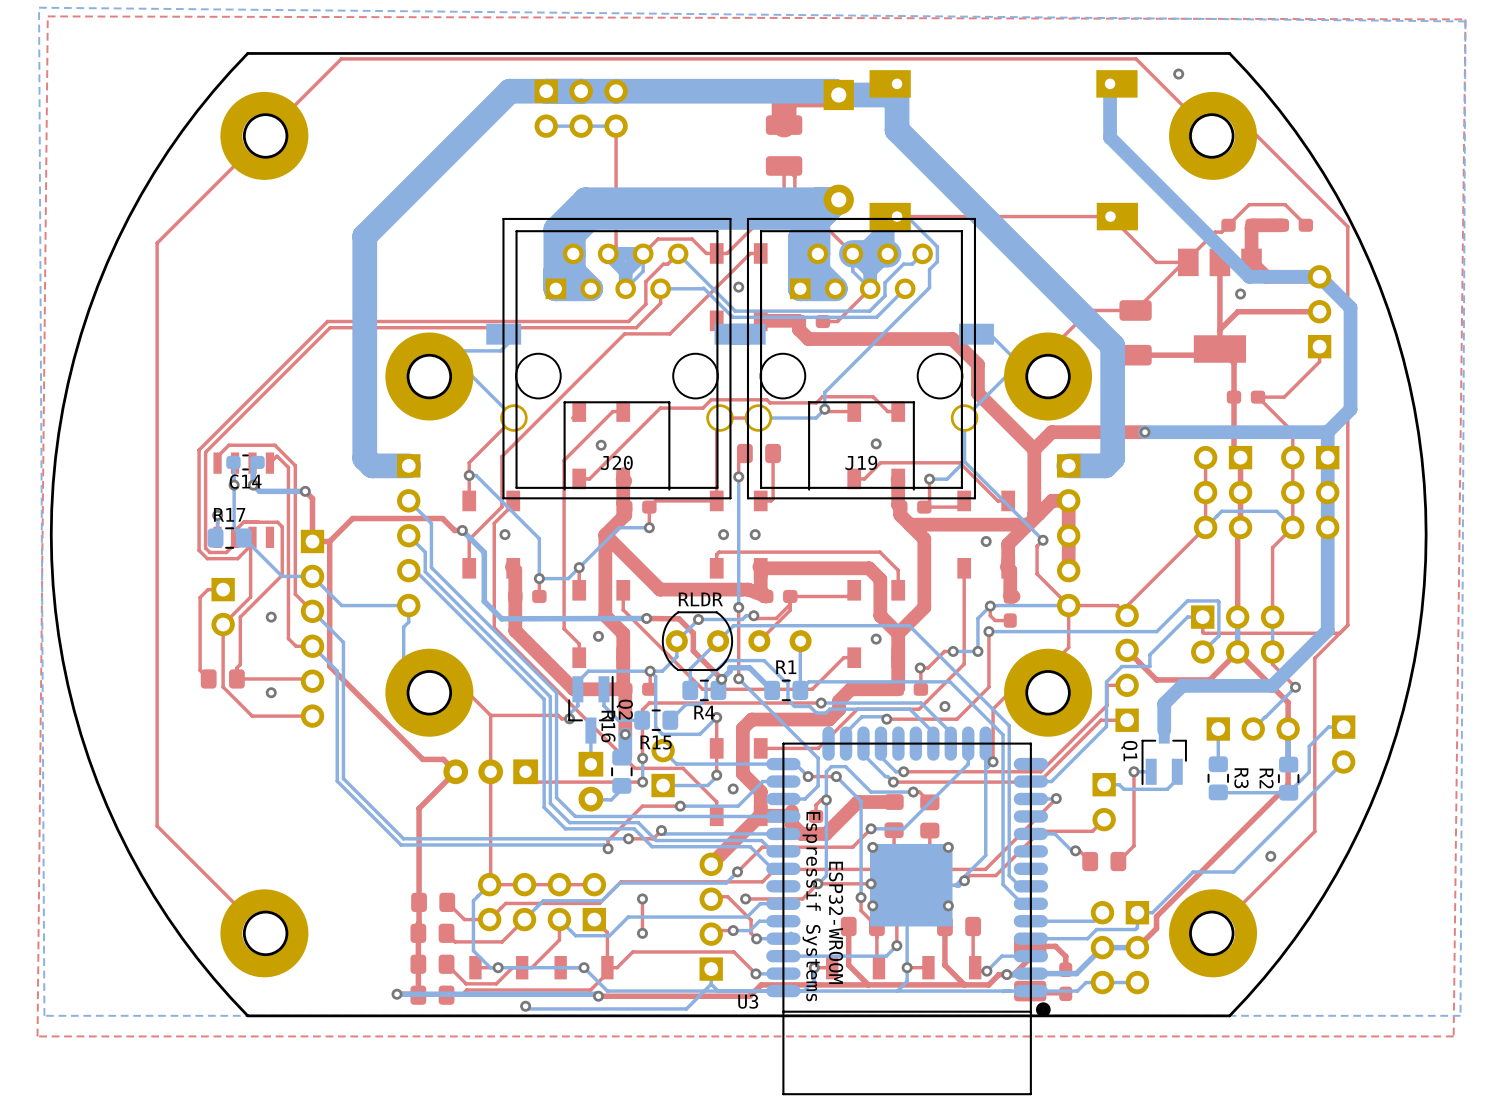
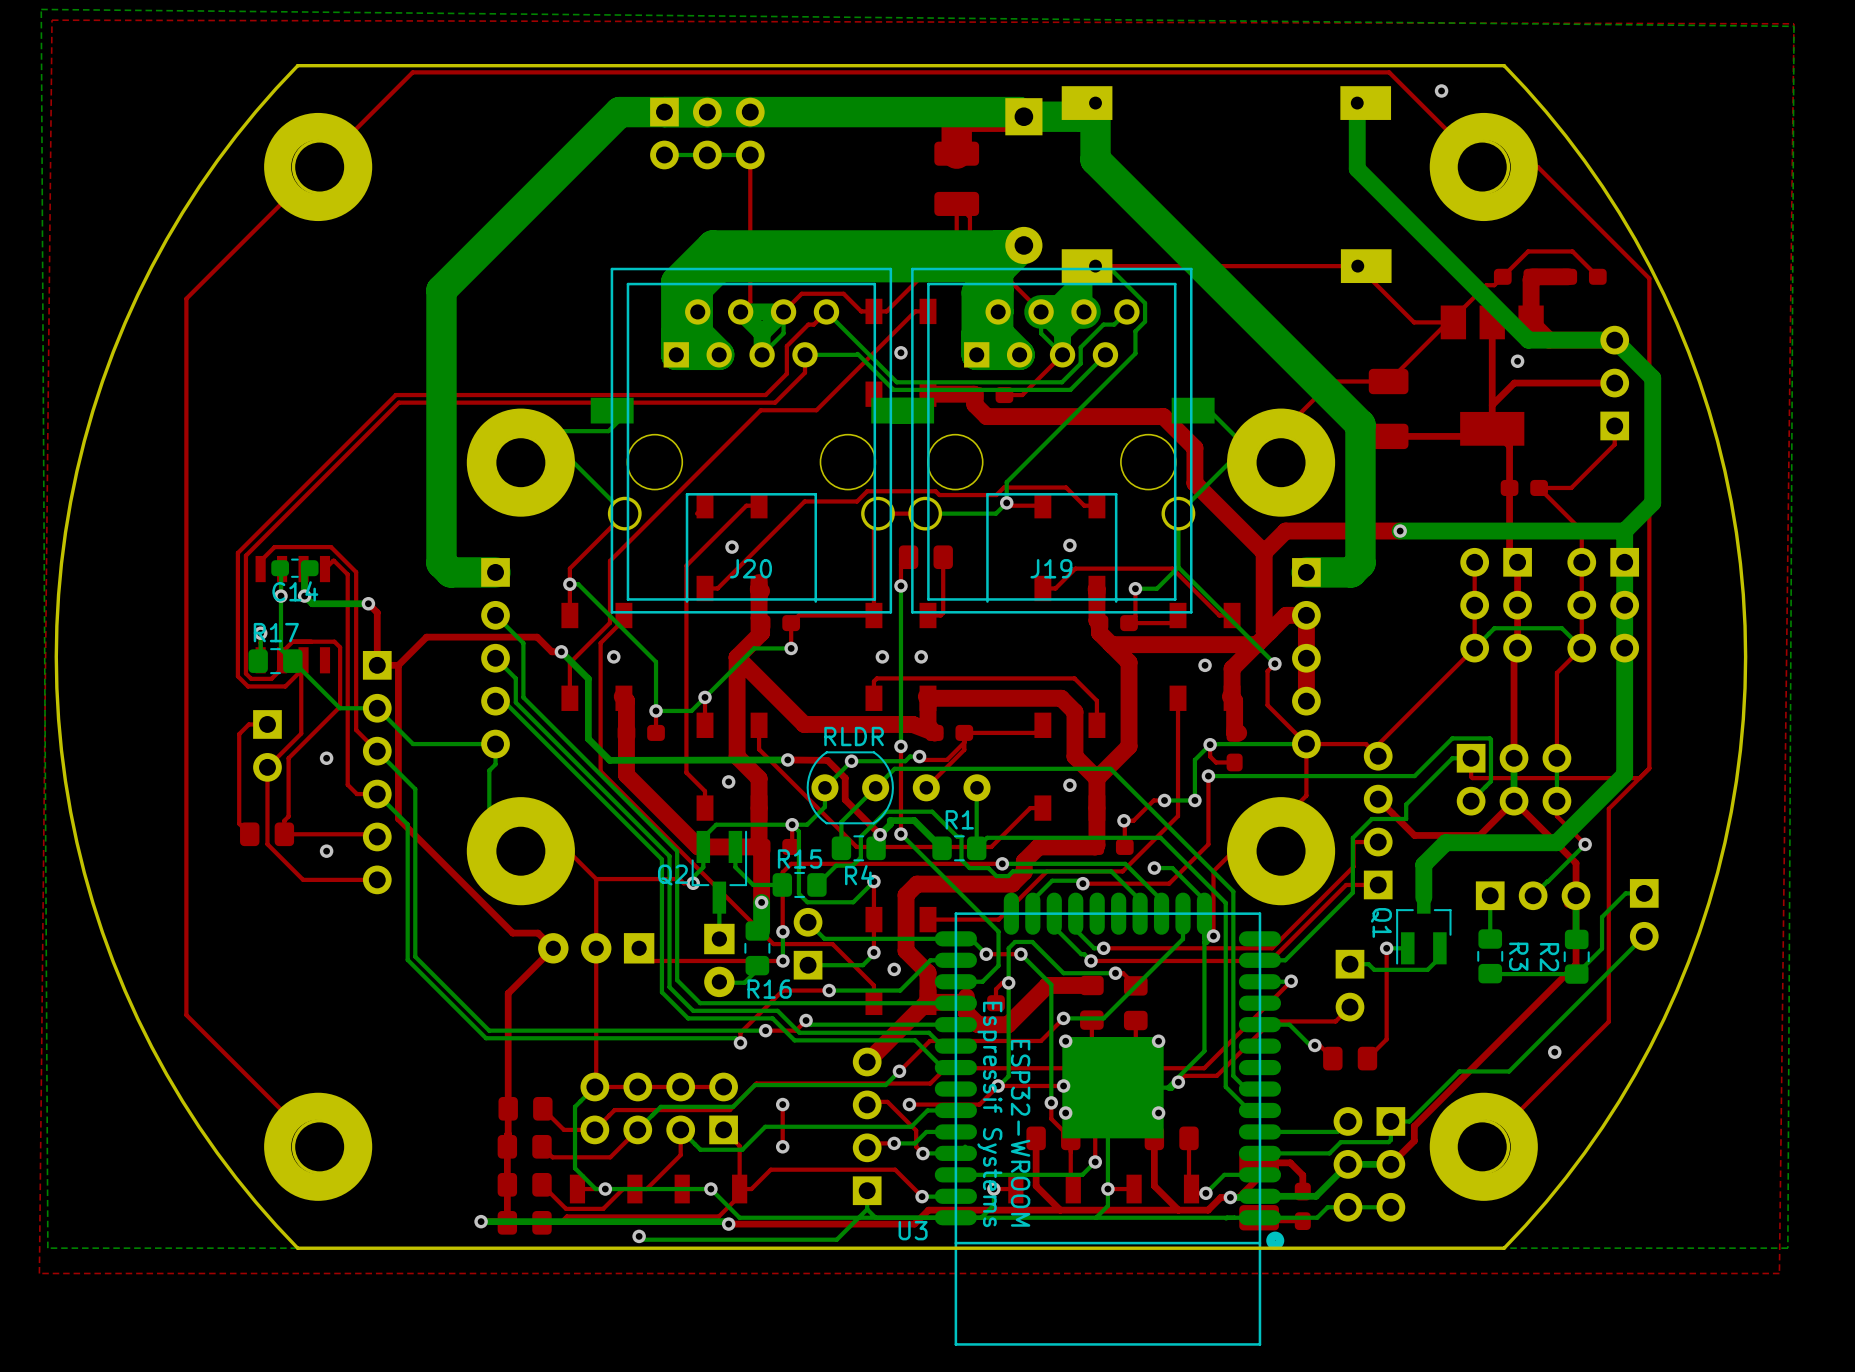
bottom track: none -> (1154, 868) (1172, 868) (1204, 900) (1204, 913)
Q2 name rotation: 0° (624, 709) -> 90° counterclockwise (672, 874)
Q2 name position: Q2 (624, 709) -> Q2 (672, 874)
R16 name rotation: 0° (608, 726) -> 90° counterclockwise (769, 989)
R16 name position: R16 (608, 726) -> R16 (769, 989)
R15 name position: R15 (656, 742) -> R15 (800, 858)

